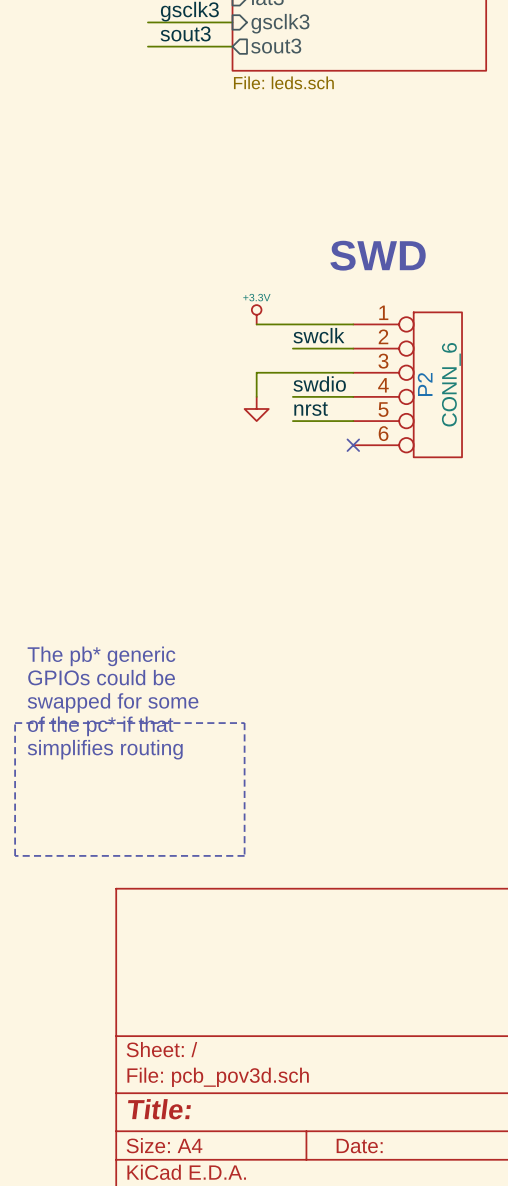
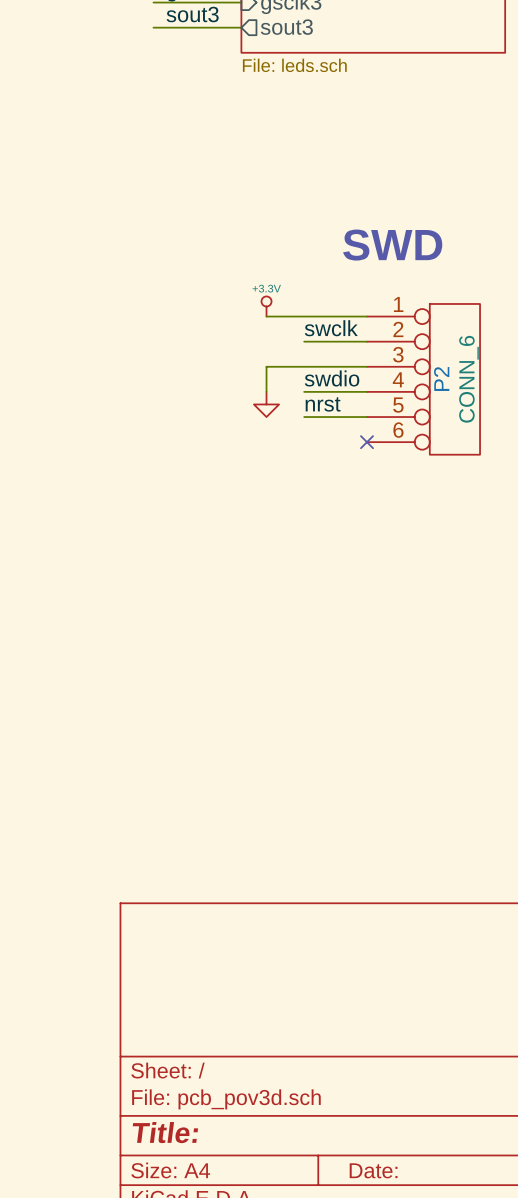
text: The pb* generic (101, 656) -> none
text: GPIOs could be (101, 677) -> none
text: swapped for some (113, 703) -> none
line: (15, 723) (244, 723) (244, 855) (15, 855) (15, 723) -> none
text: of the pc* if that (100, 726) -> none
text: simplifies routing (105, 749) -> none

